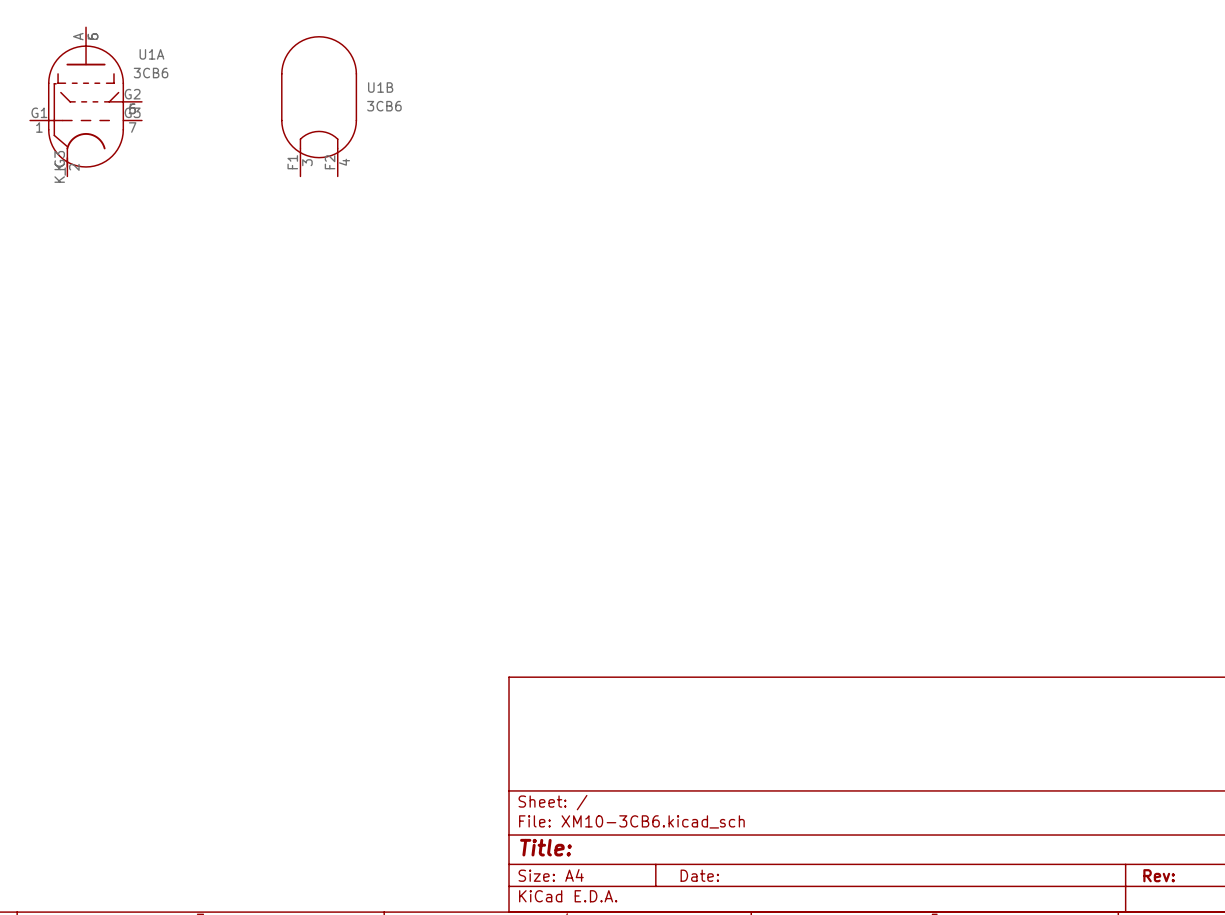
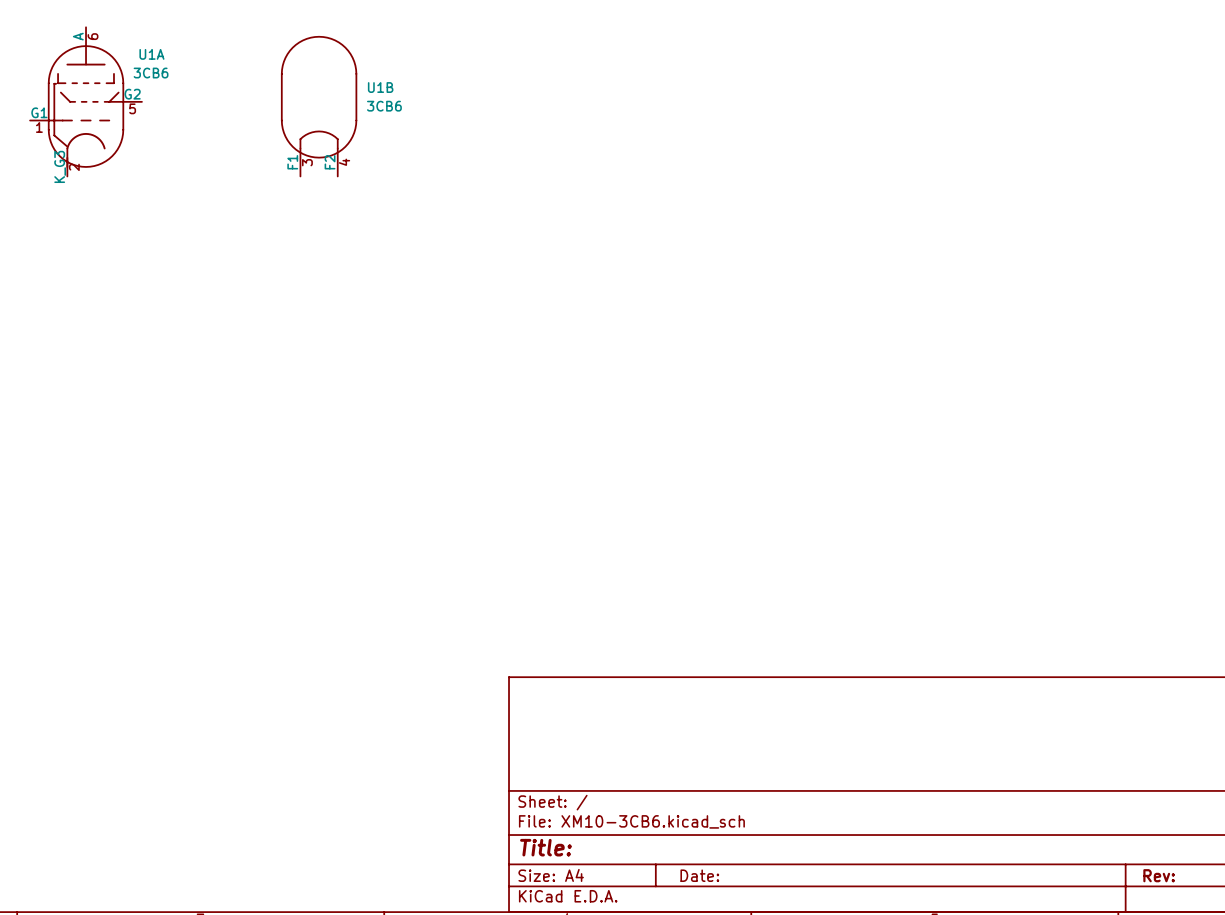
U1A symbol: [30, 27, 142, 177] -> [30, 27, 142, 177]

